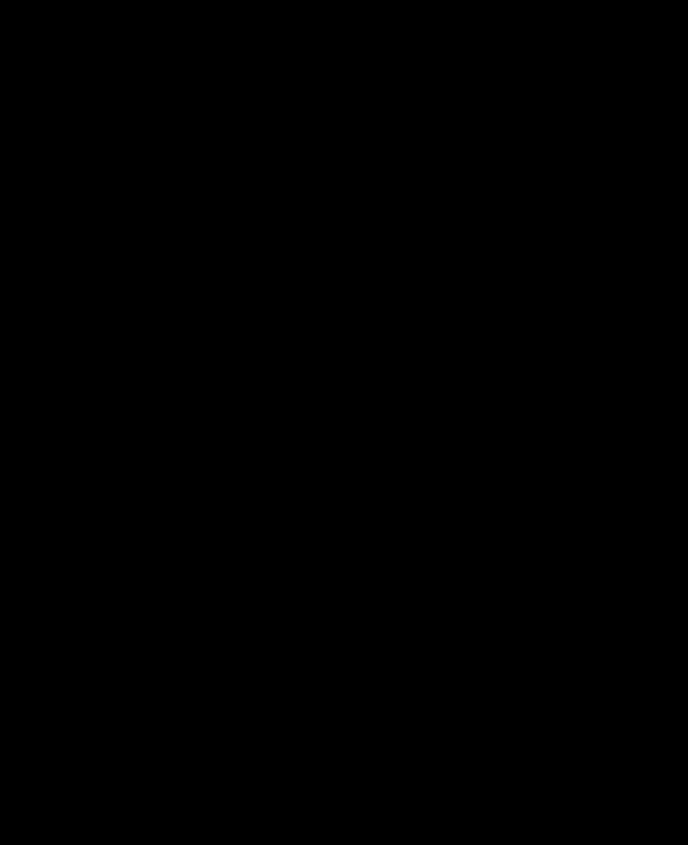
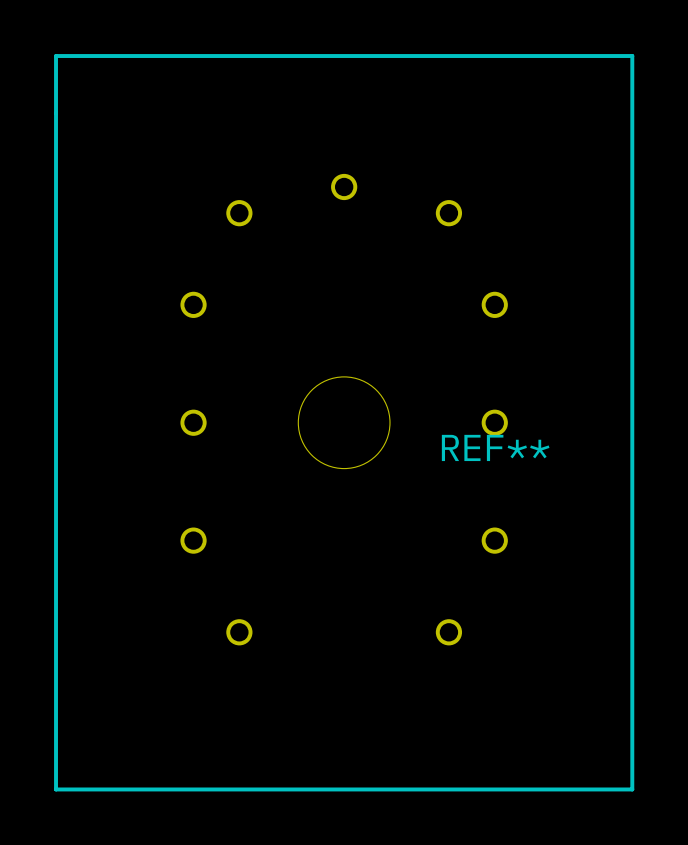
REF**: none -> (344, 422)

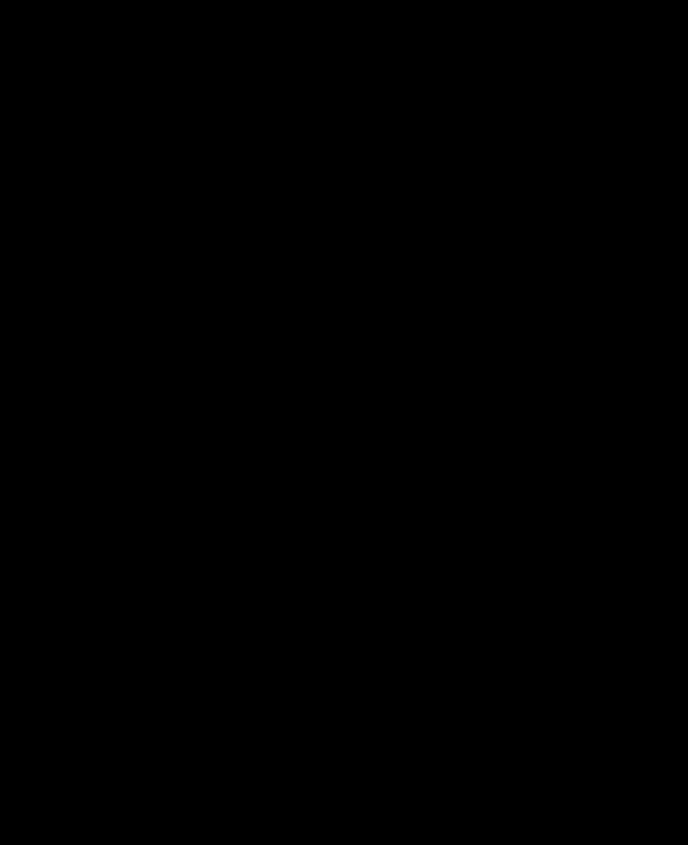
REF**: (344, 422) -> none

